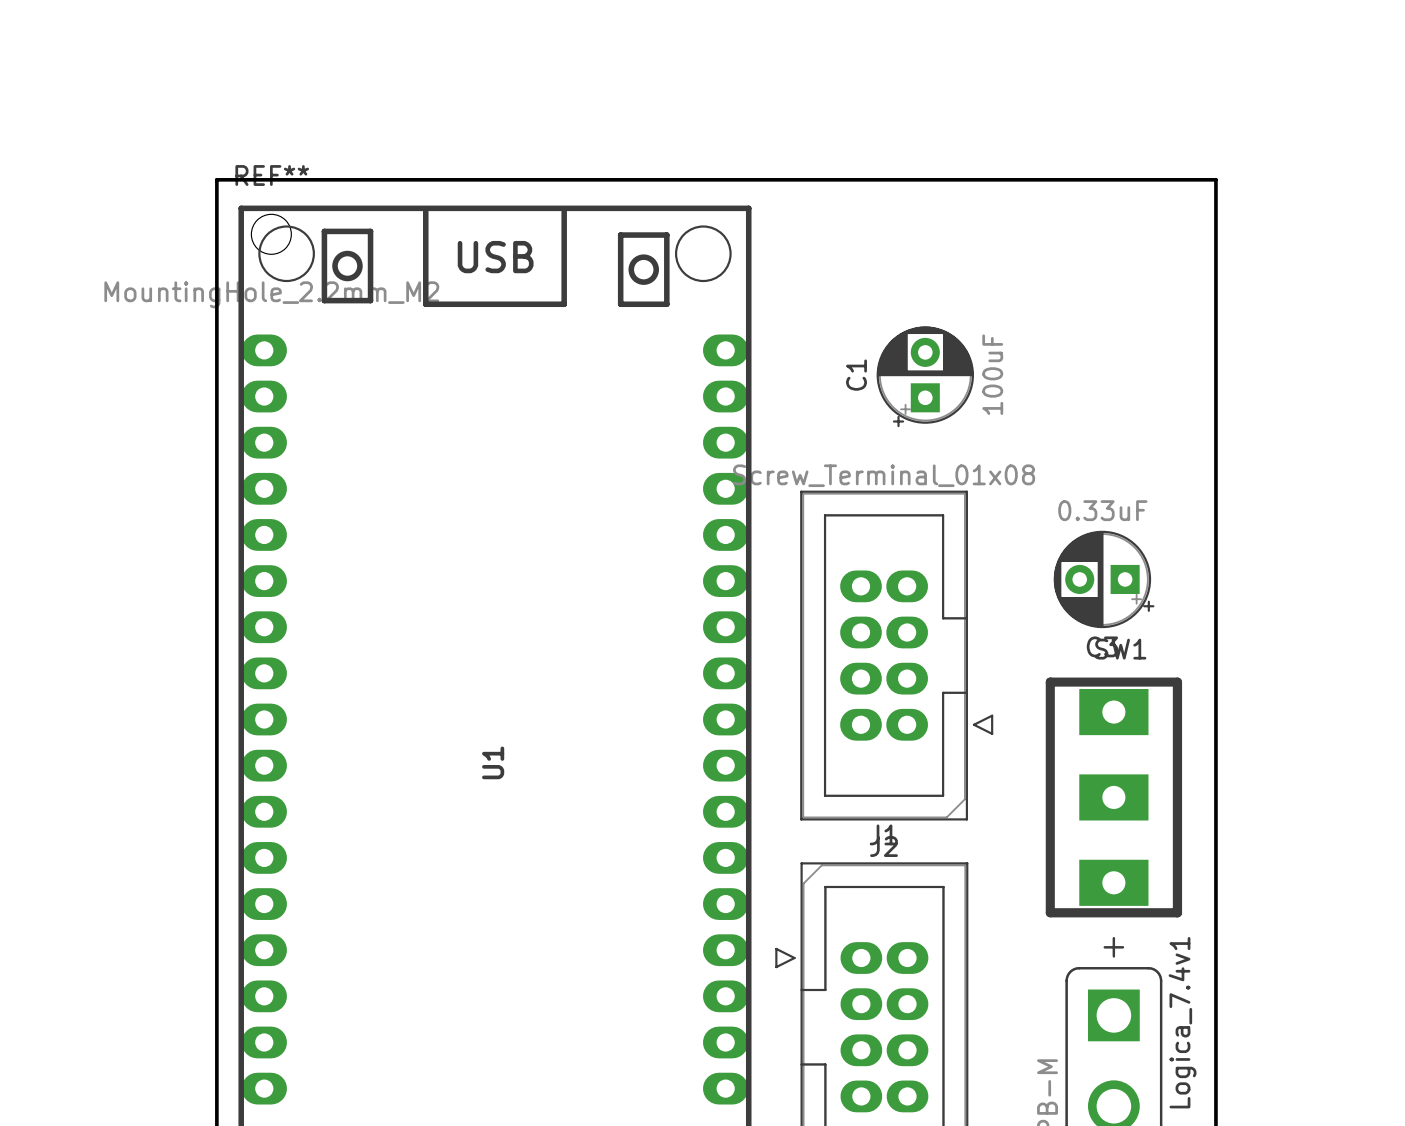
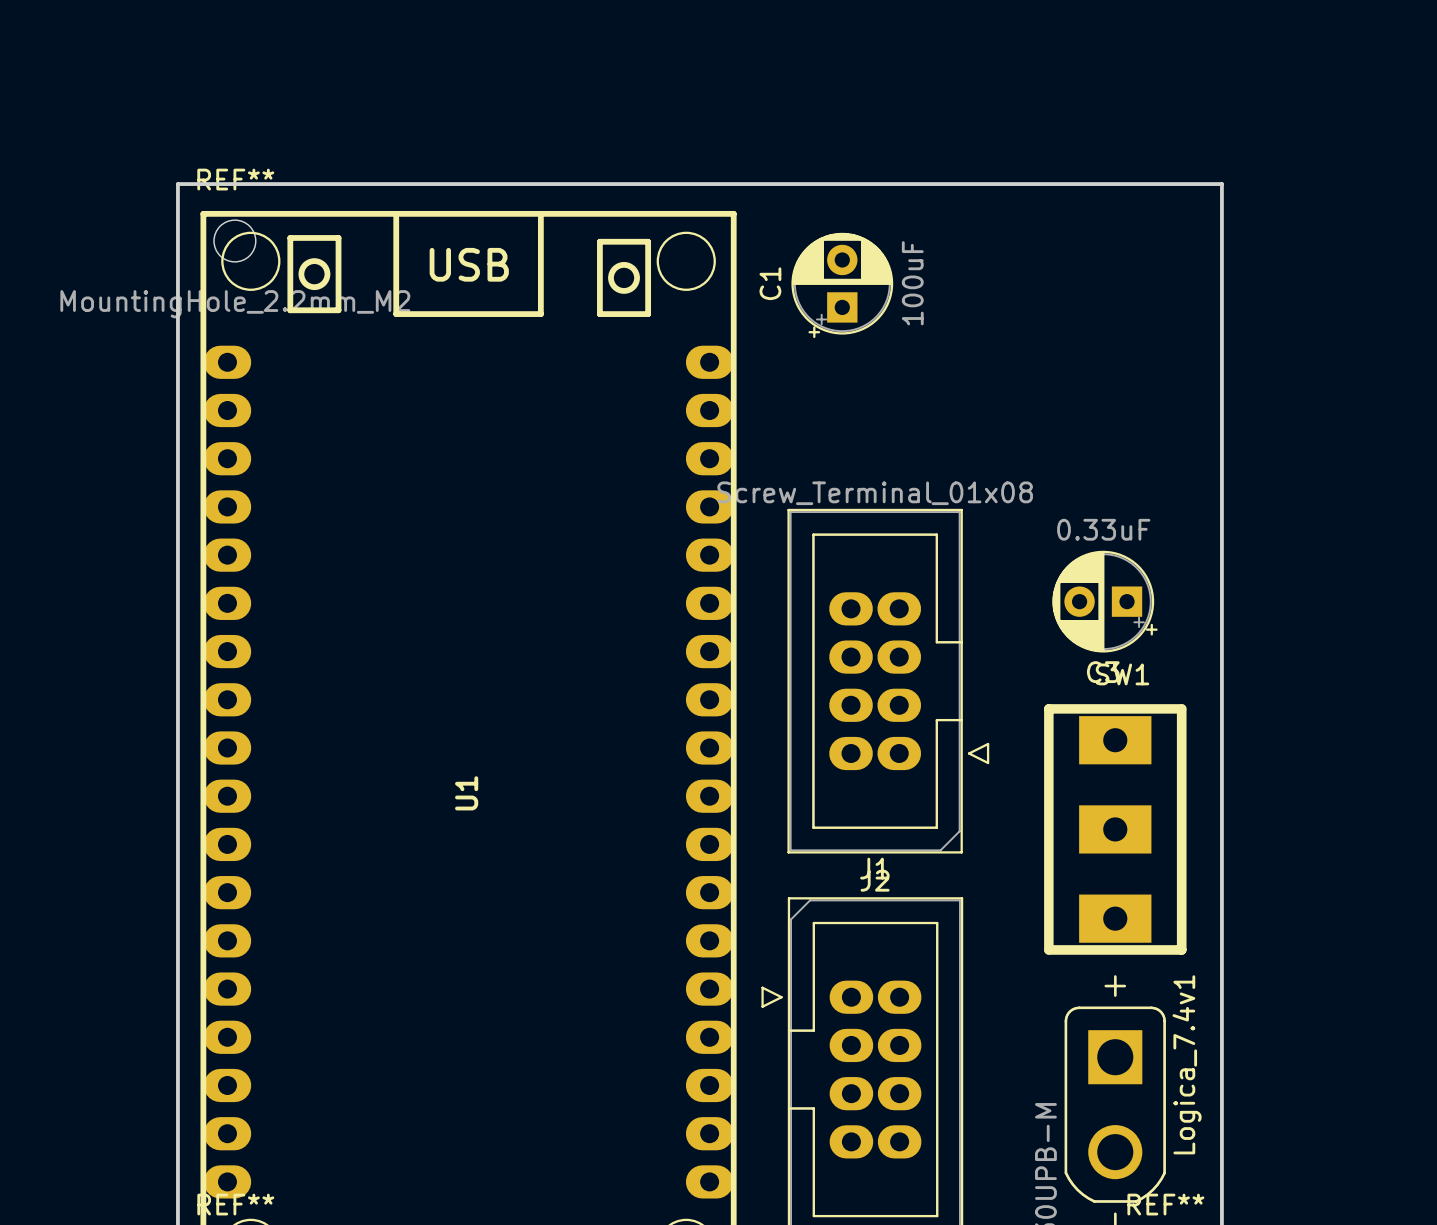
C1 position: (925, 376) -> (842, 285)

